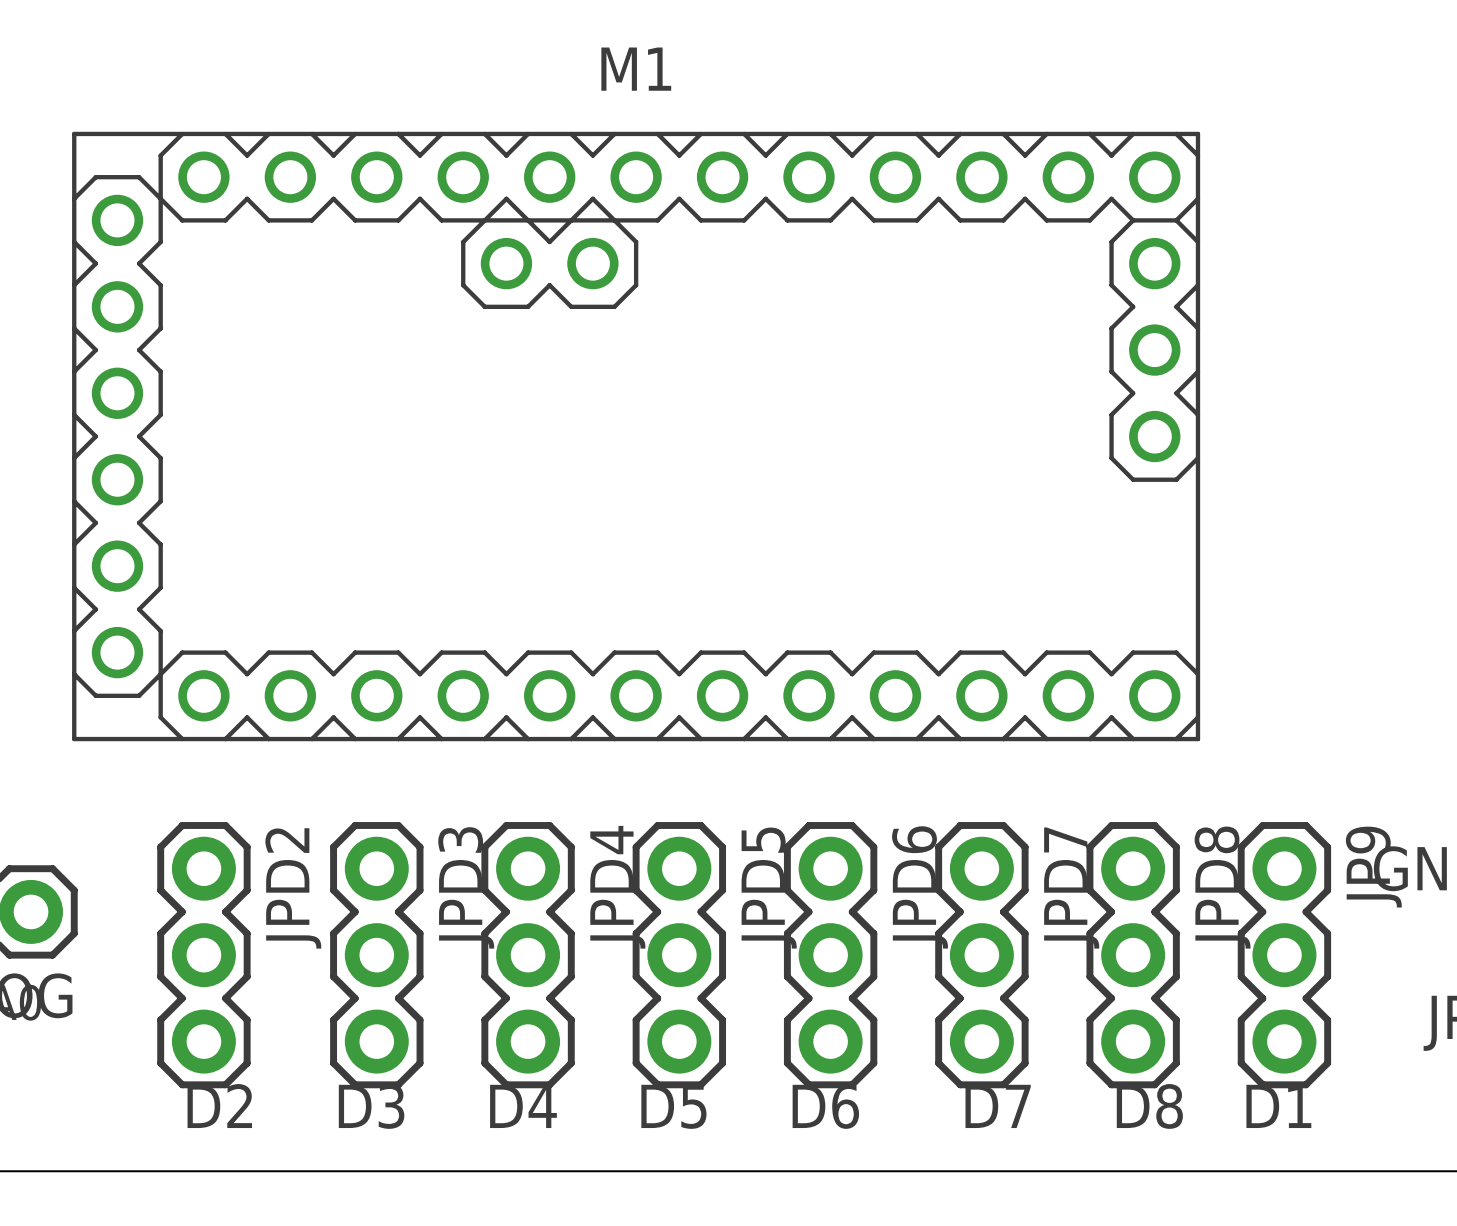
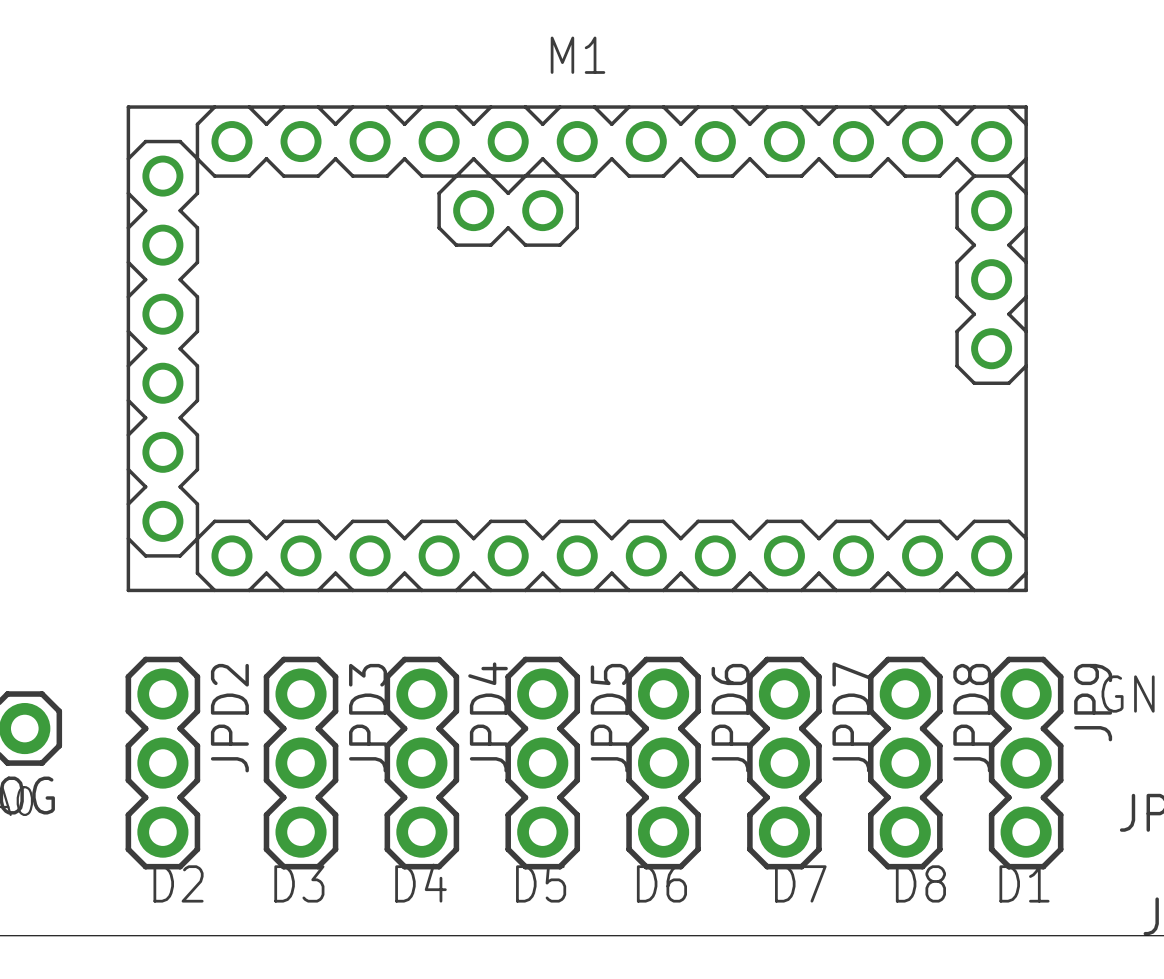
M1 position: (636, 436) -> (577, 348)

